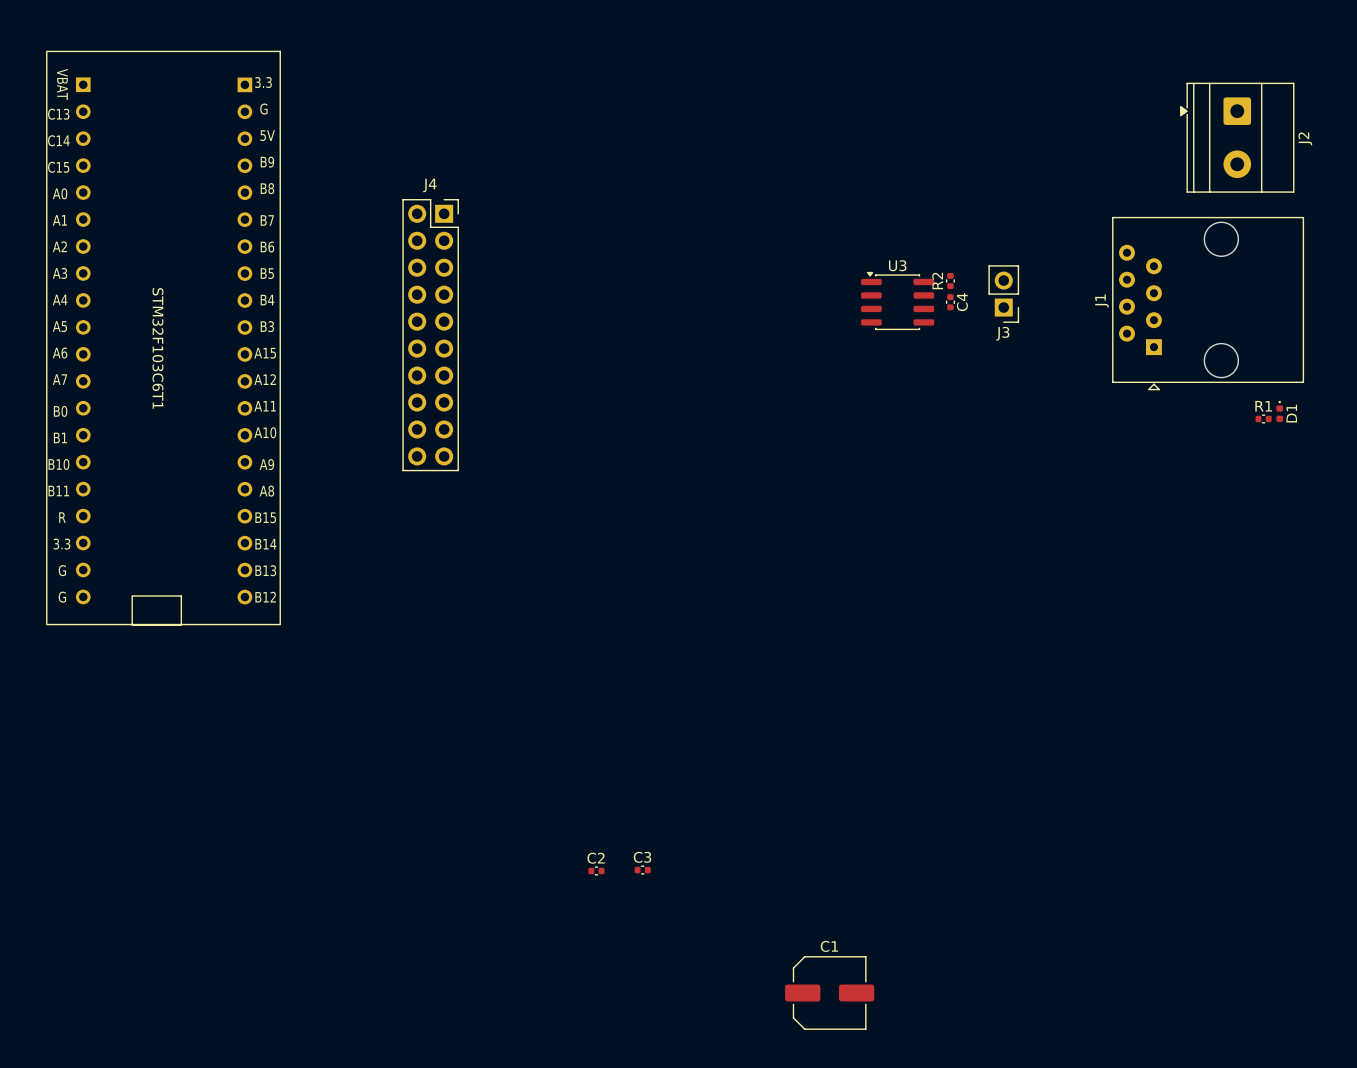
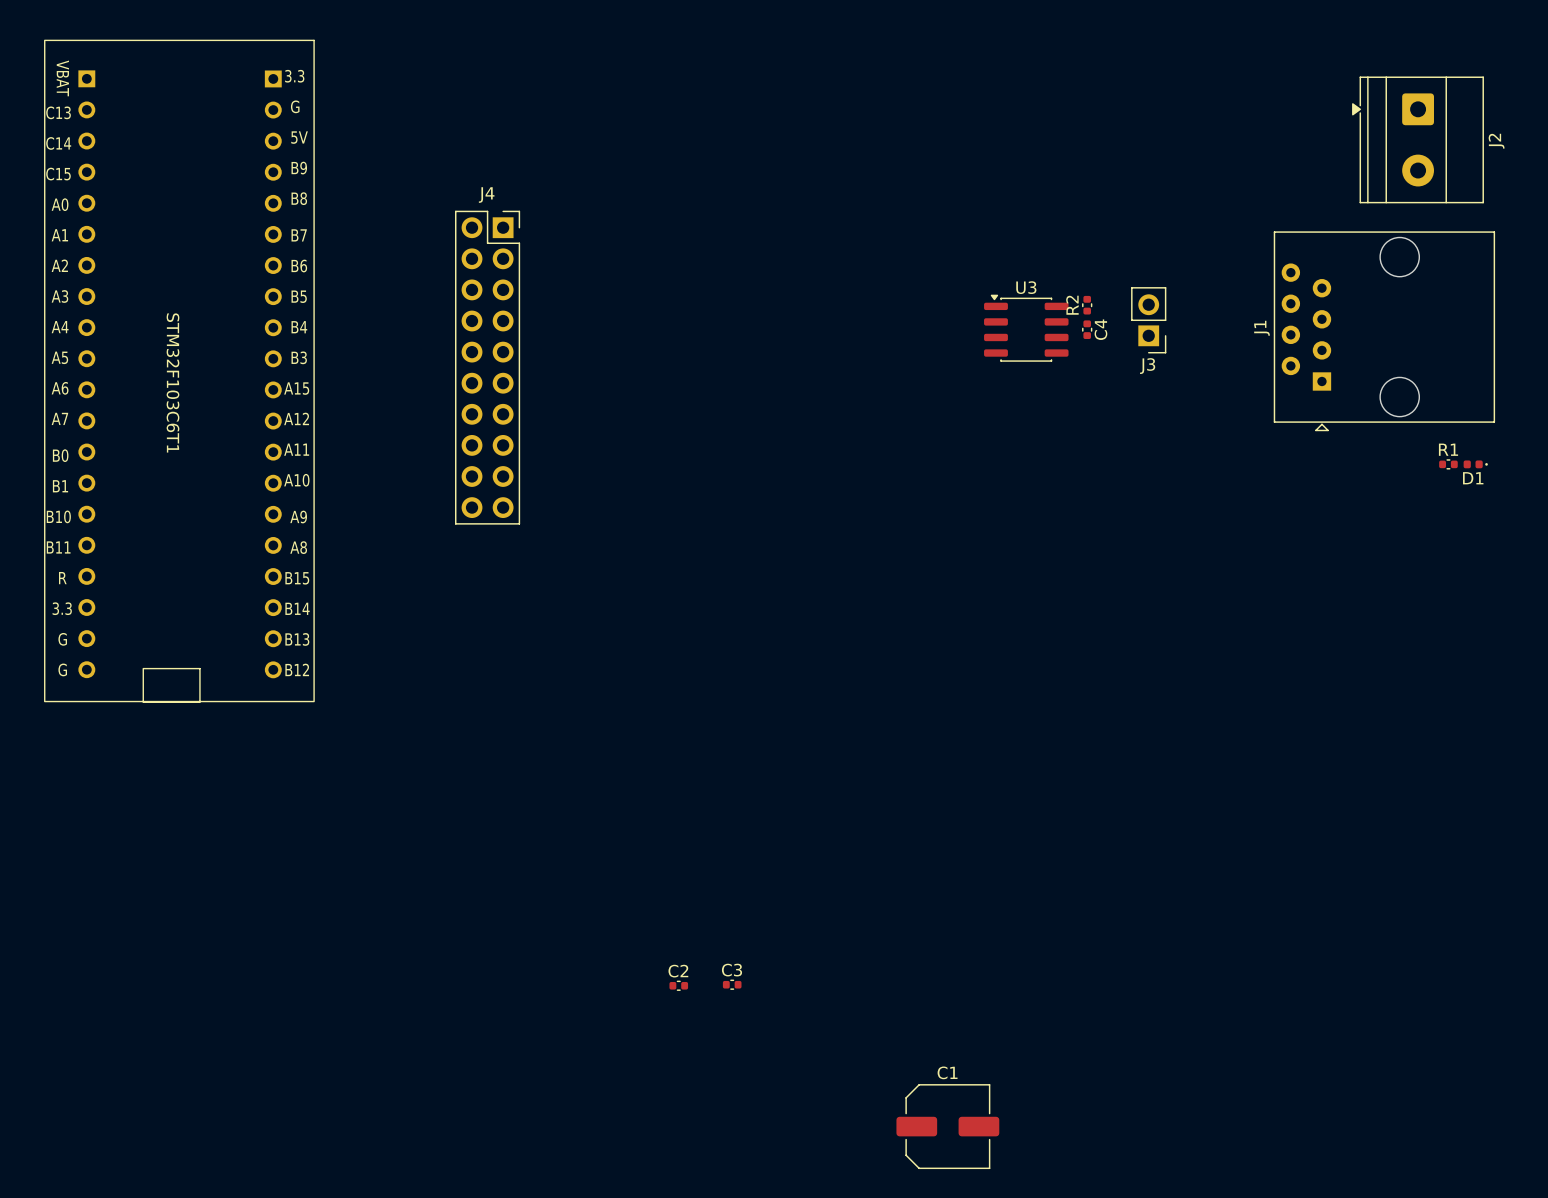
D1 rotation: 0° (1279, 411) -> 90° clockwise (1475, 464)

